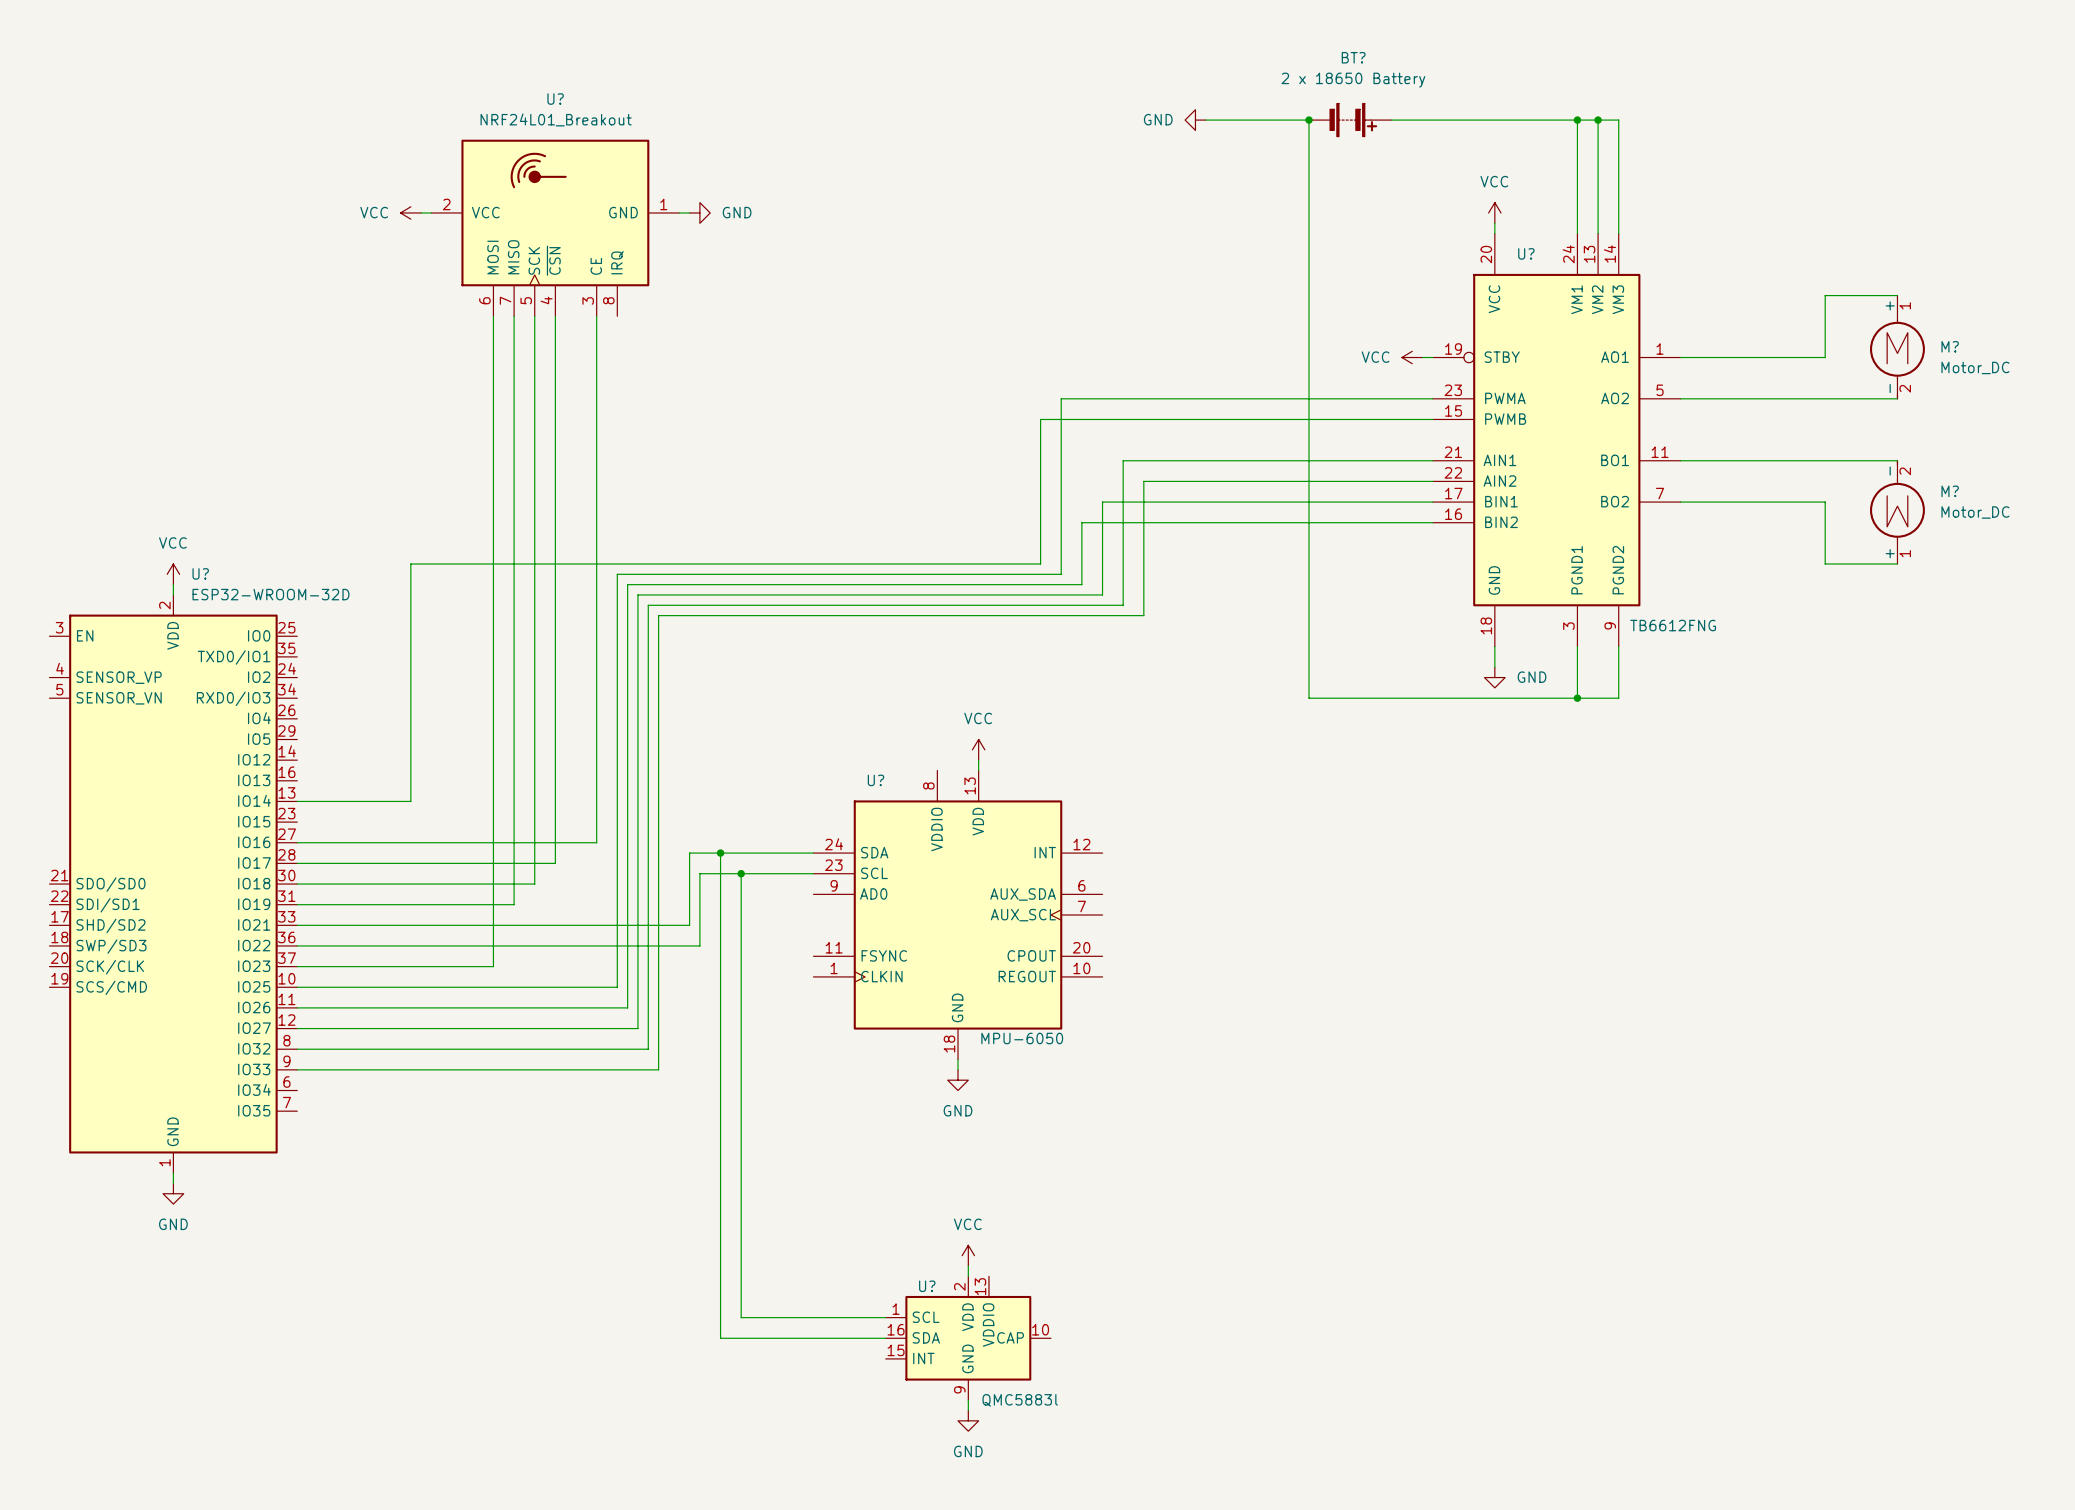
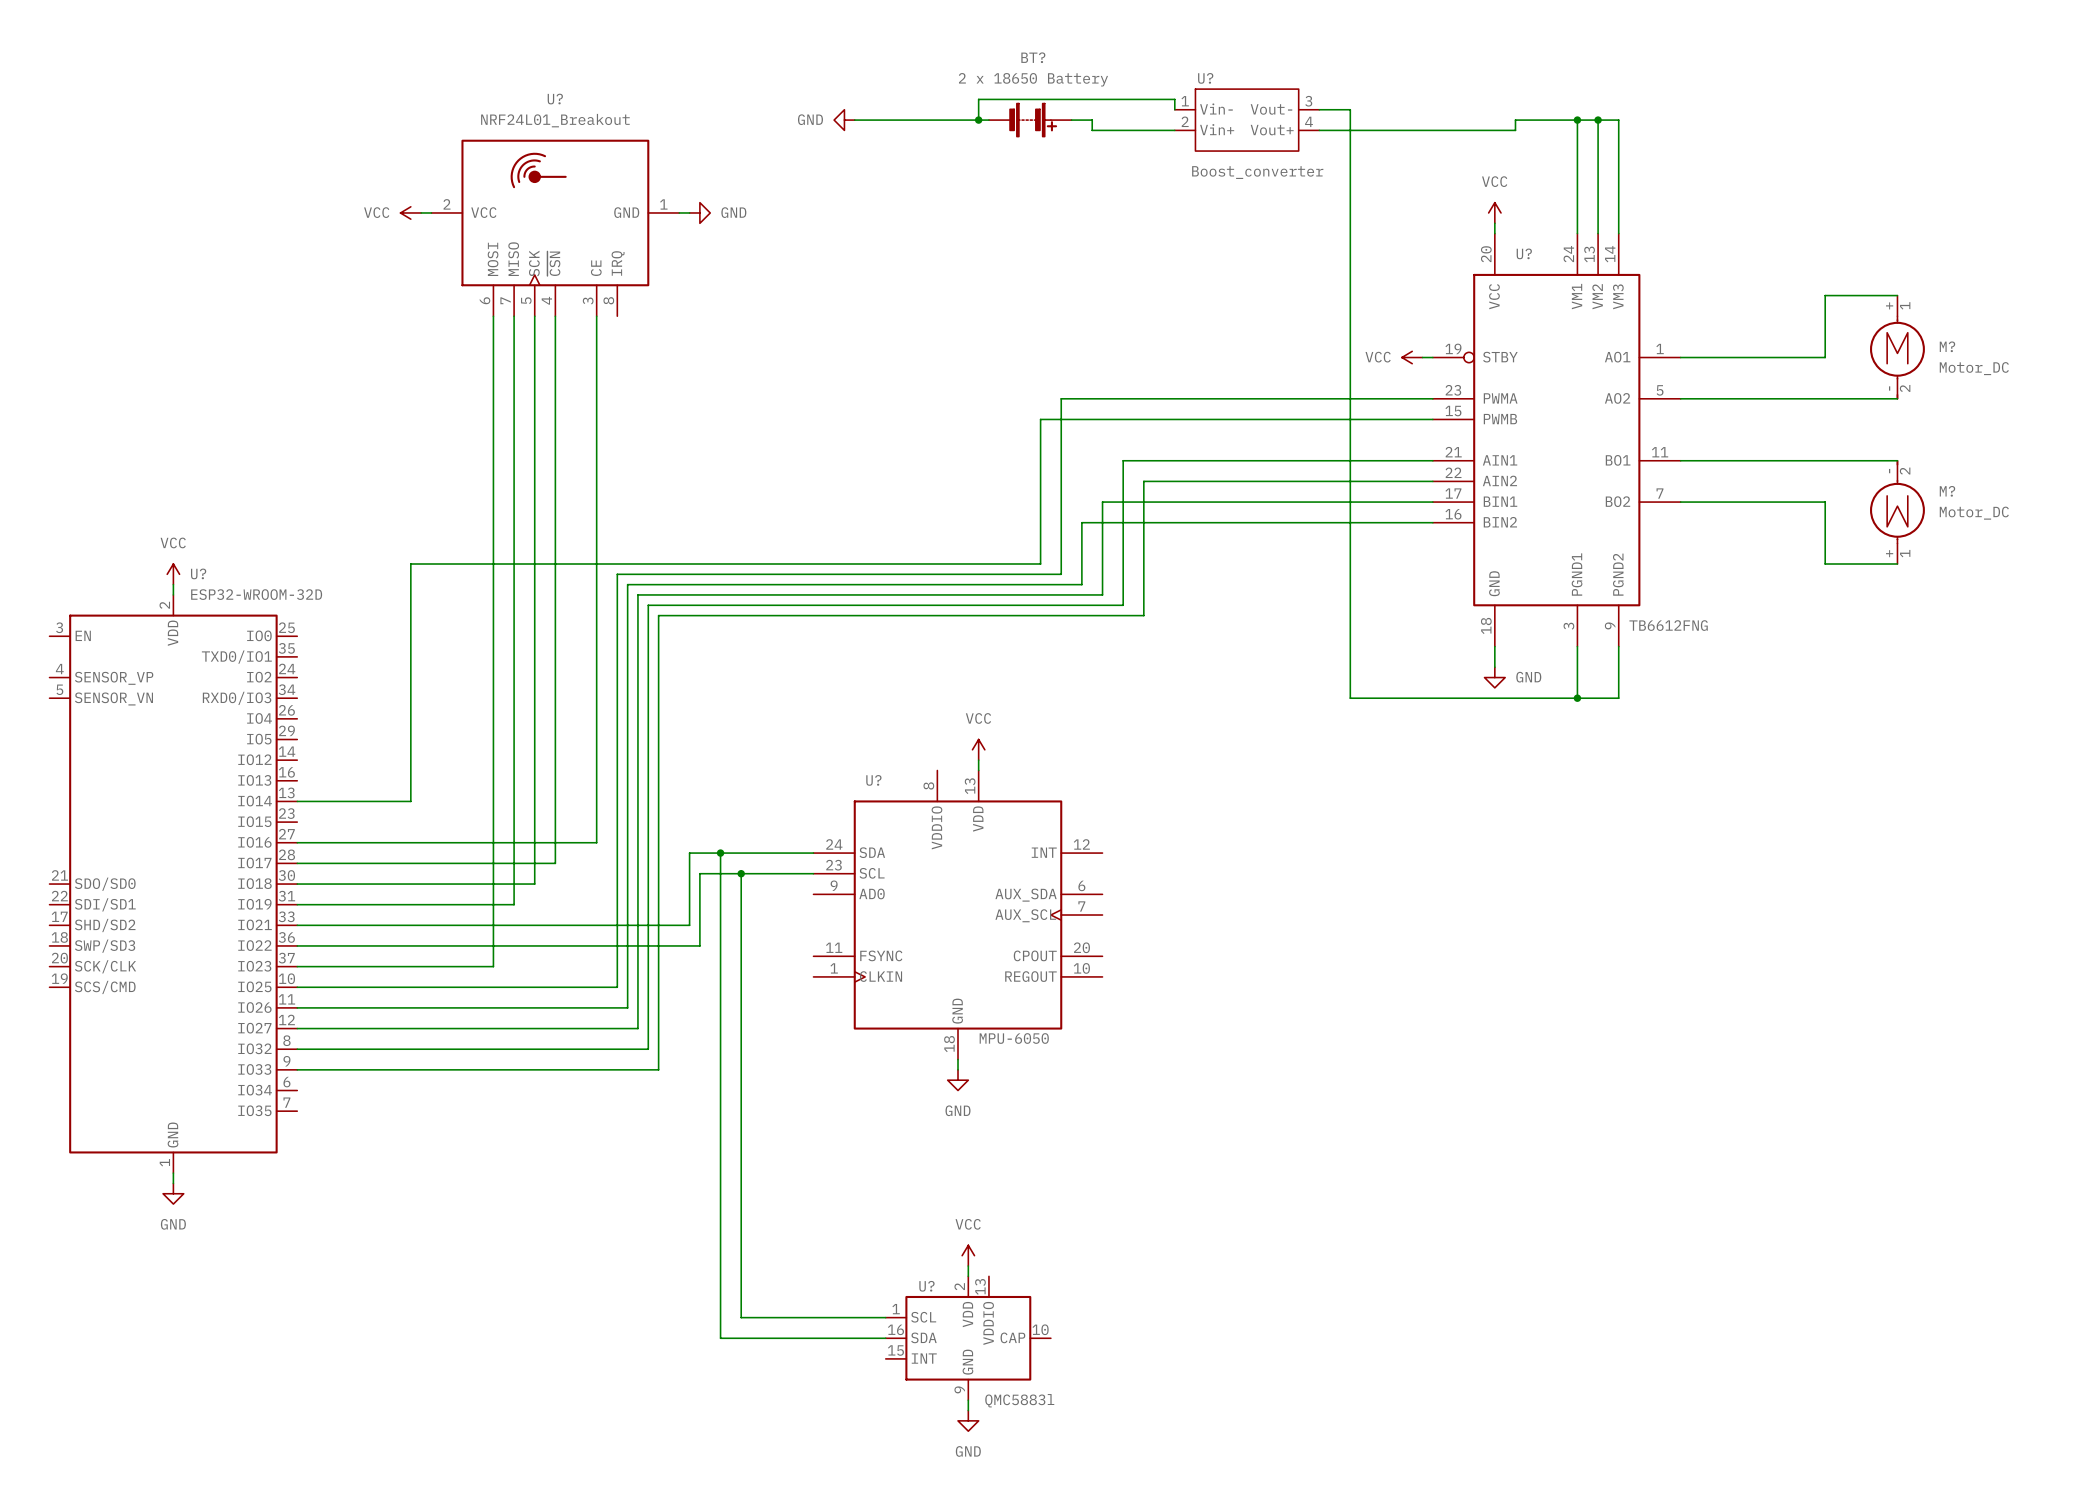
wire: none -> (1174, 109) (1174, 99) (978, 99) (978, 120)
power symbol: none -> GND (844, 120)
wire: none -> (854, 120) (988, 120)
junction: none -> (978, 120)
BT?: none -> 2 x 18650 Battery (1030, 120)
wire: none -> (1071, 120) (1092, 120) (1092, 130) (1174, 130)
power symbol: GND (1195, 120) -> none
wire: (1205, 120) (1309, 120) (1309, 698) (1350, 698) -> (1319, 109) (1350, 109) (1350, 698)
U?: none -> Boost_converter (1247, 120)
junction: (1309, 120) -> none
BT?: 2 x 18650 Battery (1350, 120) -> none
wire: (1391, 120) (1515, 120) -> (1319, 130) (1515, 130) (1515, 120)

